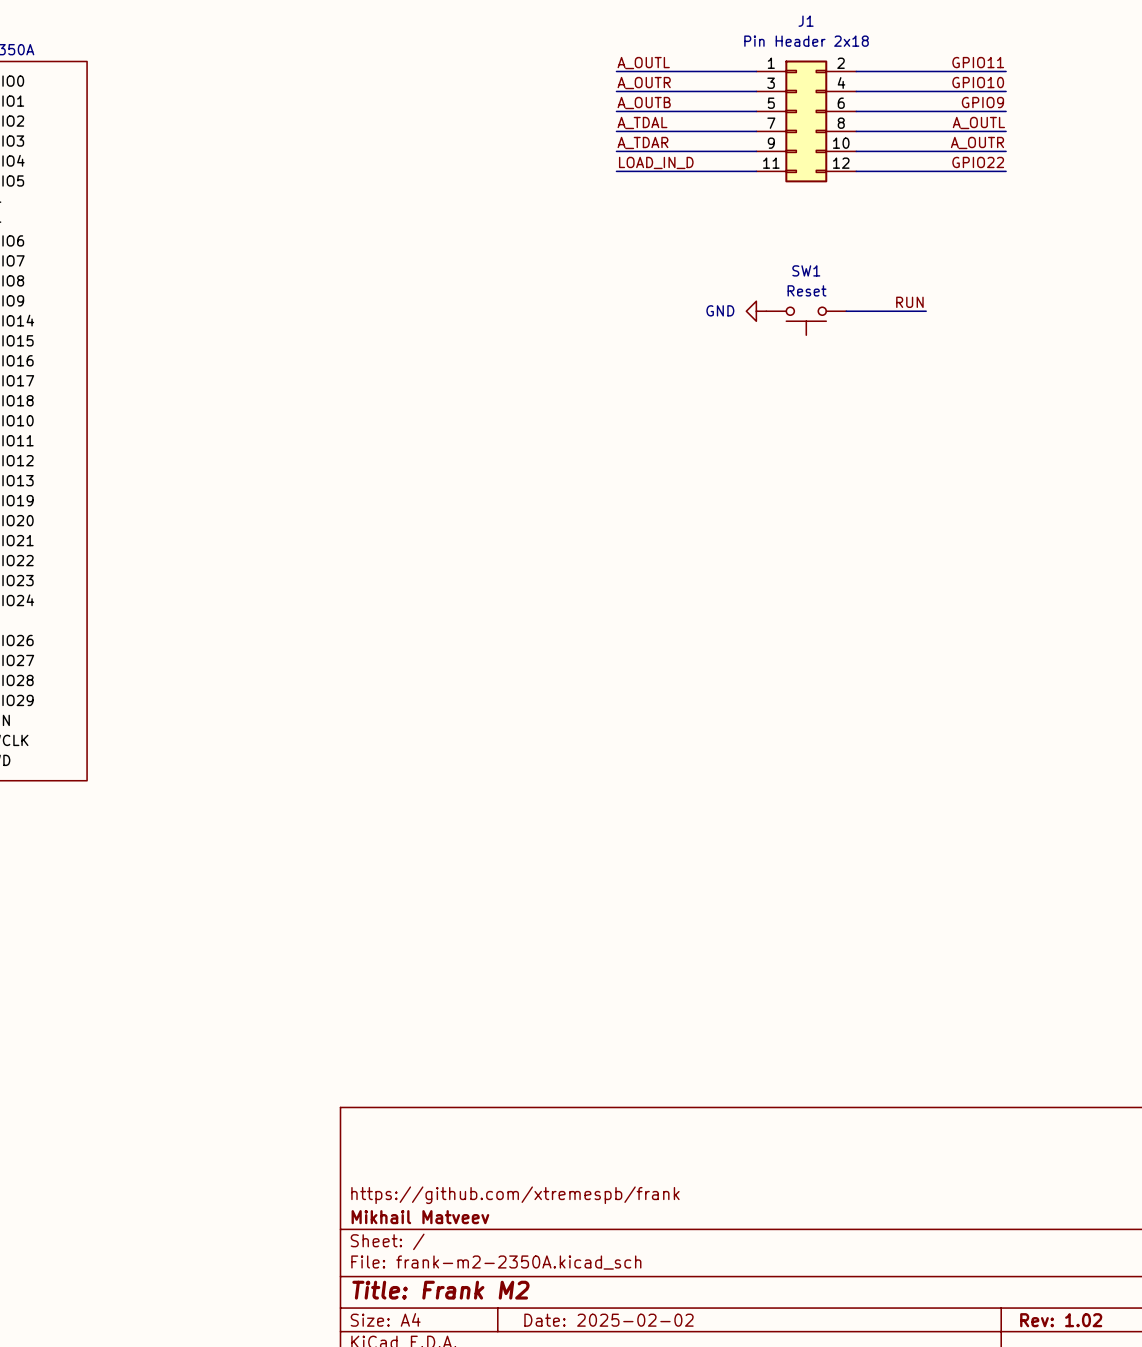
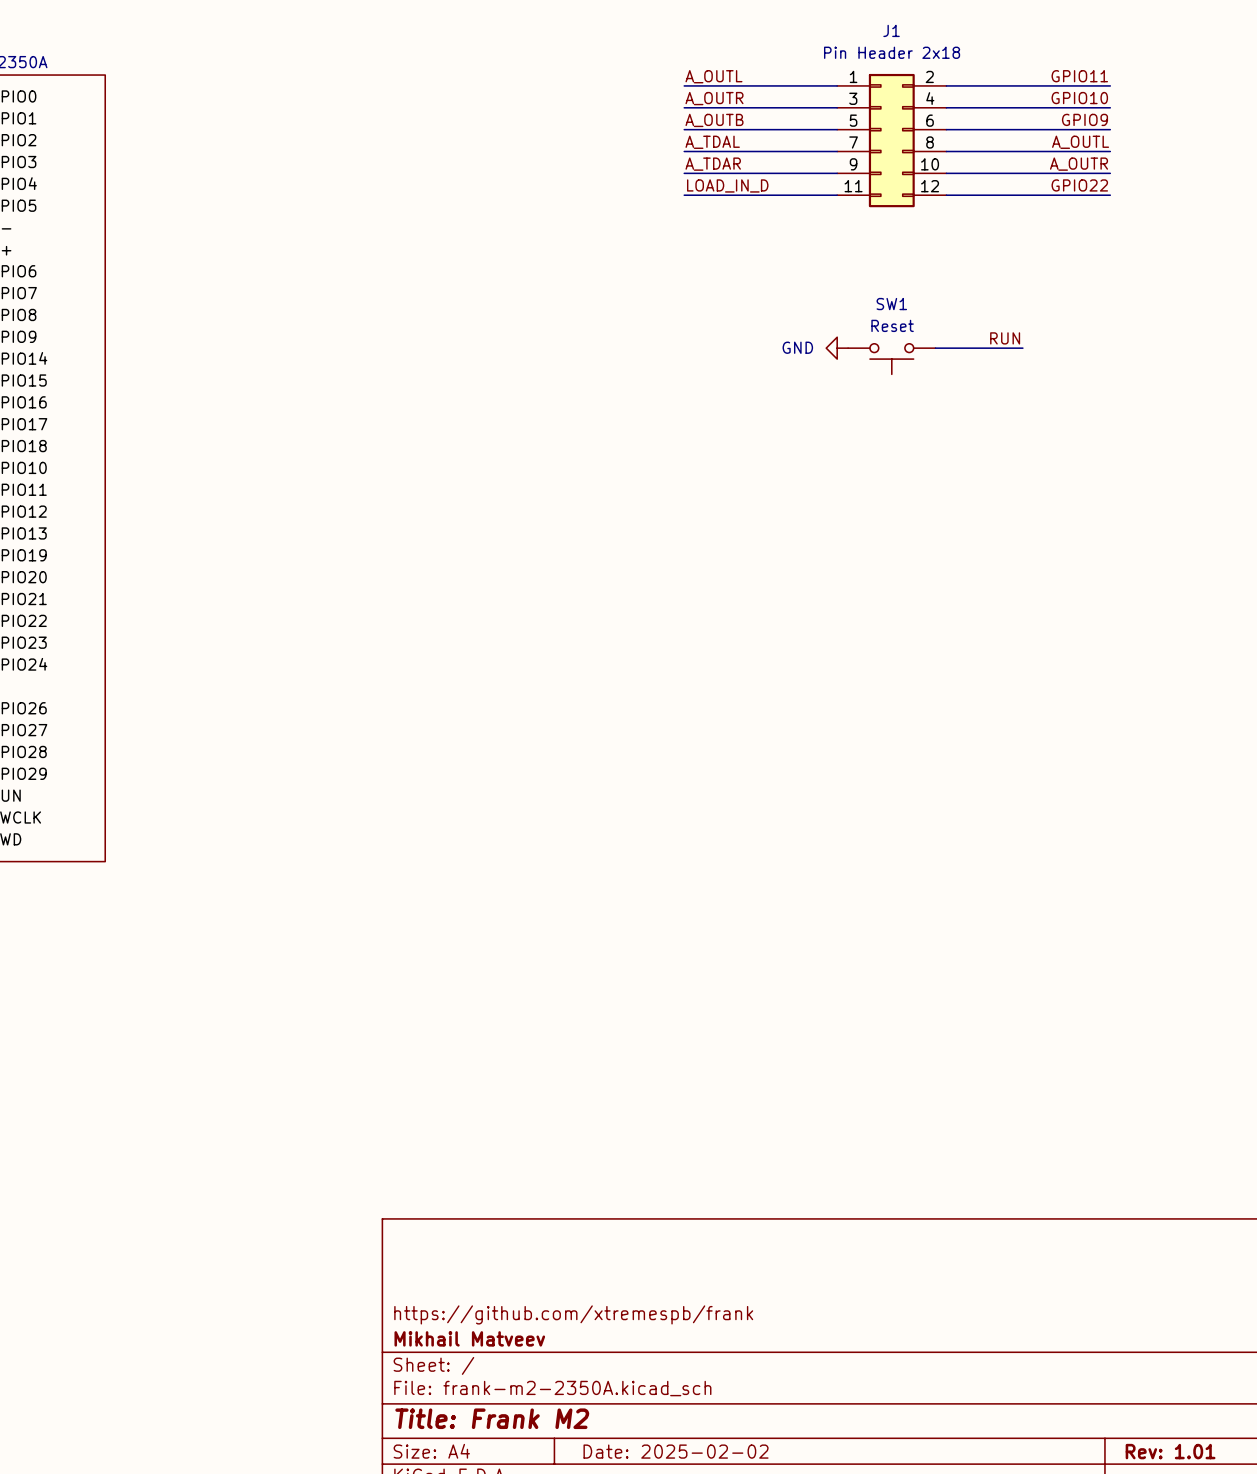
title block: Rev: 1.02 (1061, 1320) -> Rev: 1.01 (1170, 1451)

